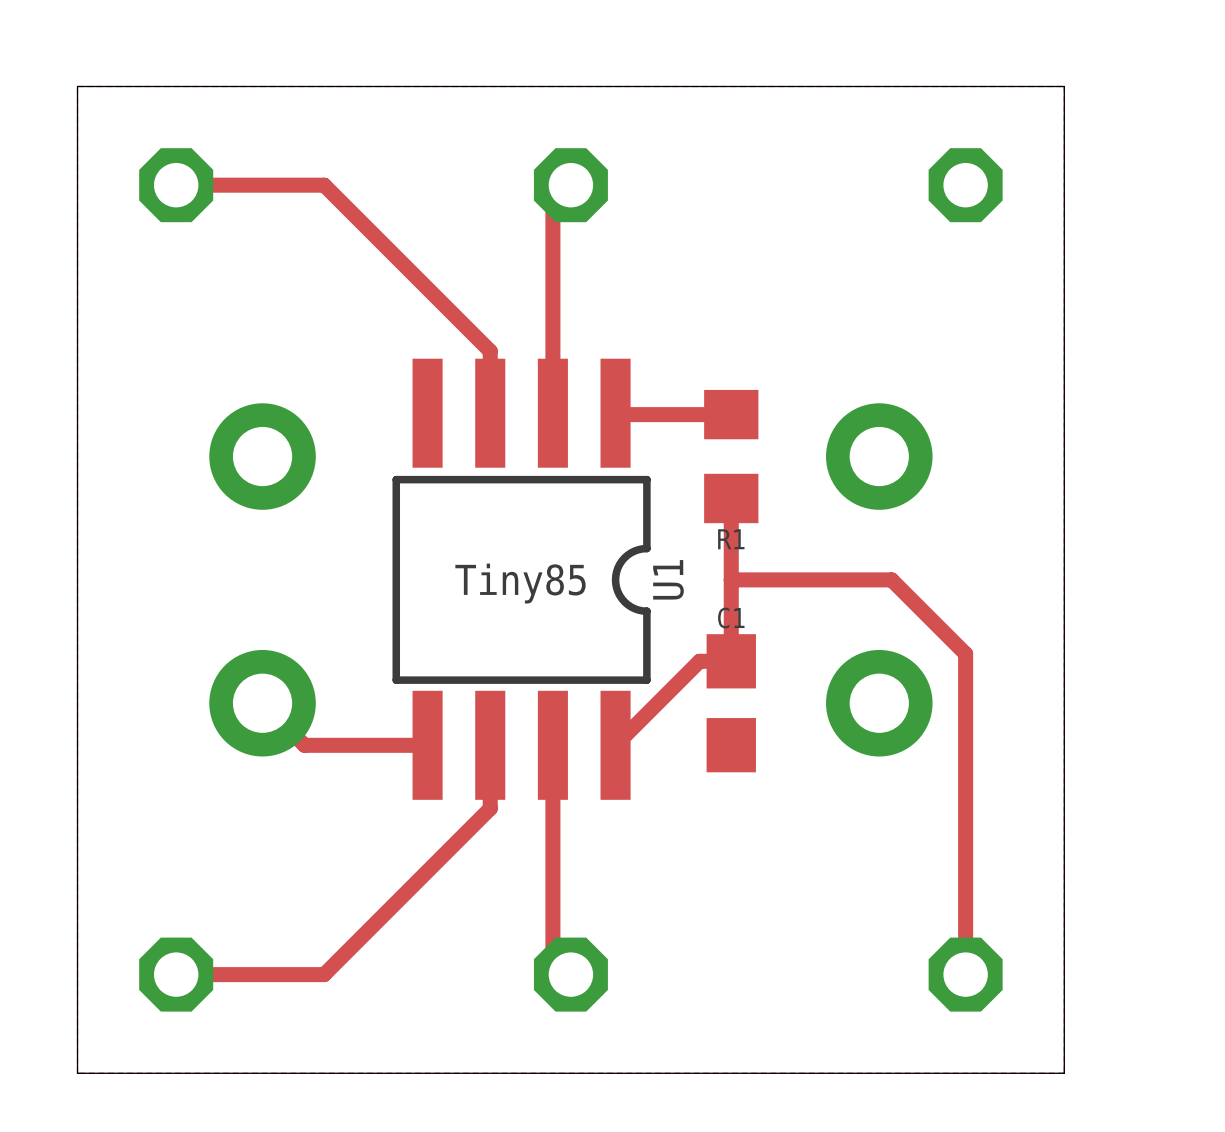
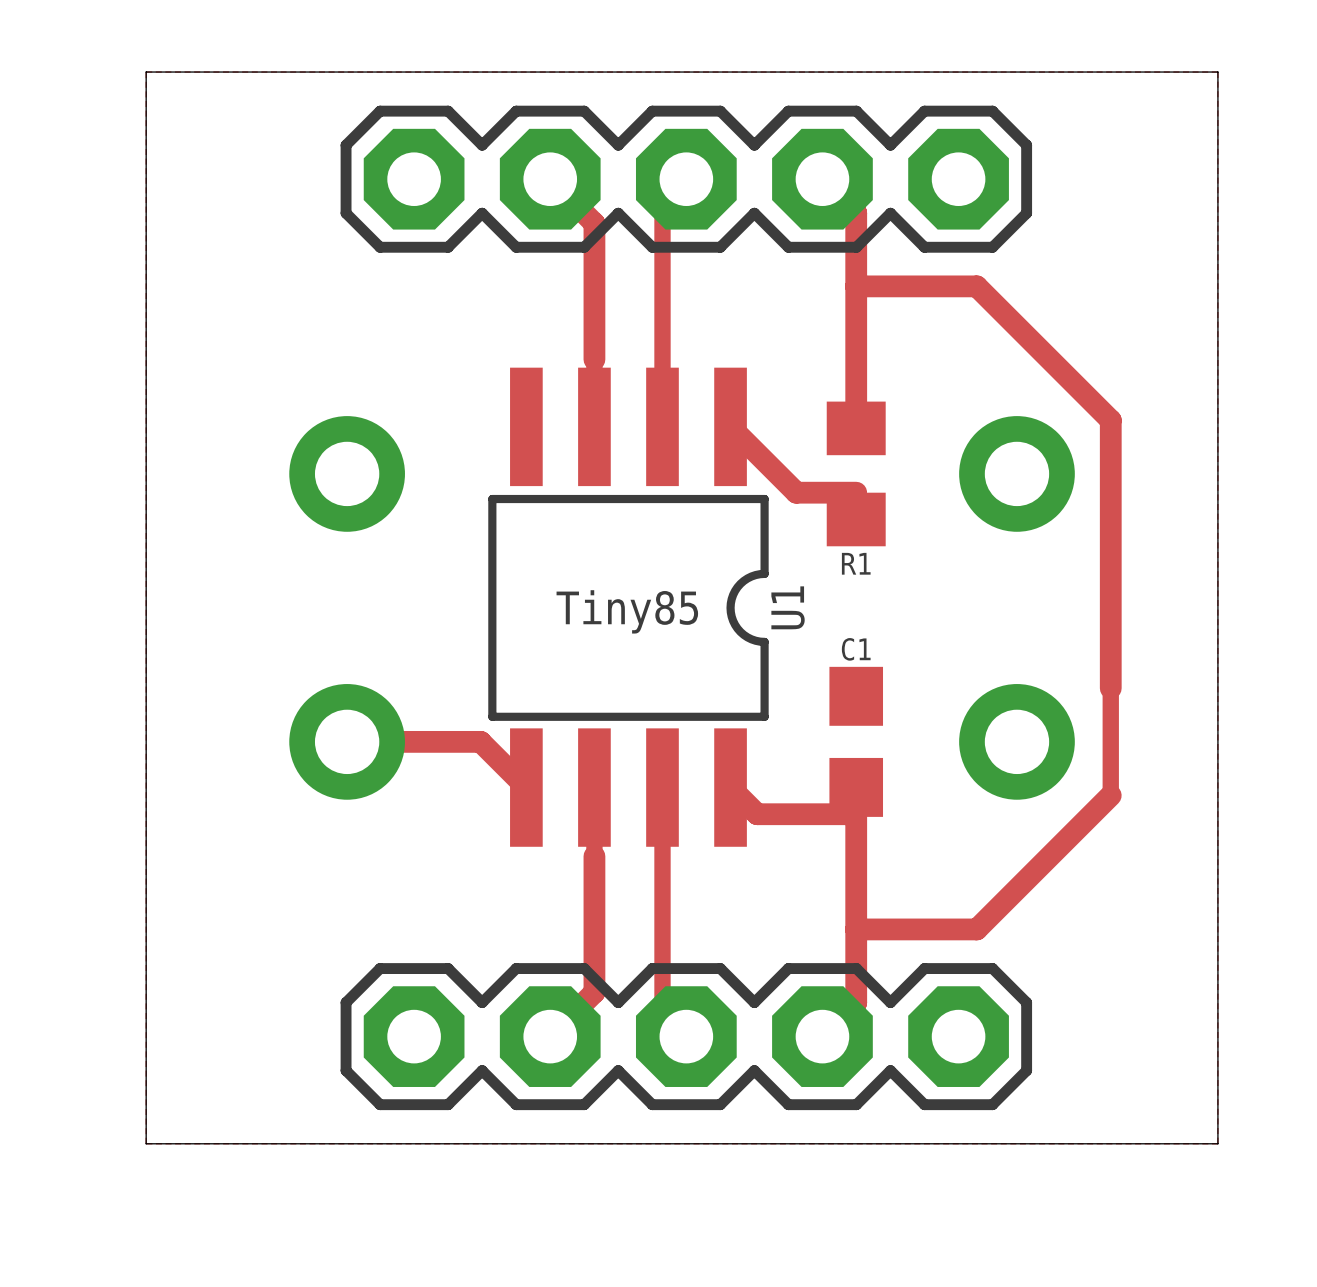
part footprint: [533, 148, 608, 223] -> [340, 105, 1033, 253]
track: (176, 185) (324, 185) (490, 351) -> (550, 179) (594, 223) (594, 359)
part: (176, 185) -> none
track: none -> (822, 179) (856, 212) (856, 401)
part: (965, 185) -> none
track: (616, 414) (731, 414) -> (730, 426) (796, 492) (856, 492)
track: (731, 498) (731, 661) (699, 661) (615, 745) -> (822, 1036) (856, 1002) (856, 814) (757, 814) (730, 787)
track: (731, 579) (891, 579) (965, 653) -> (856, 286) (976, 286) (1110, 420) (1110, 688)
track: (262, 703) (304, 745) (427, 745) -> (347, 741) (480, 741) (526, 787)
track: (965, 752) (965, 974) -> (1110, 795) (976, 929) (856, 929)
track: (490, 808) (324, 974) (176, 974) -> (594, 856) (594, 992) (550, 1036)
part footprint: [533, 937, 608, 1012] -> [340, 963, 1033, 1111]
part: (176, 974) -> none
part: (965, 974) -> none

